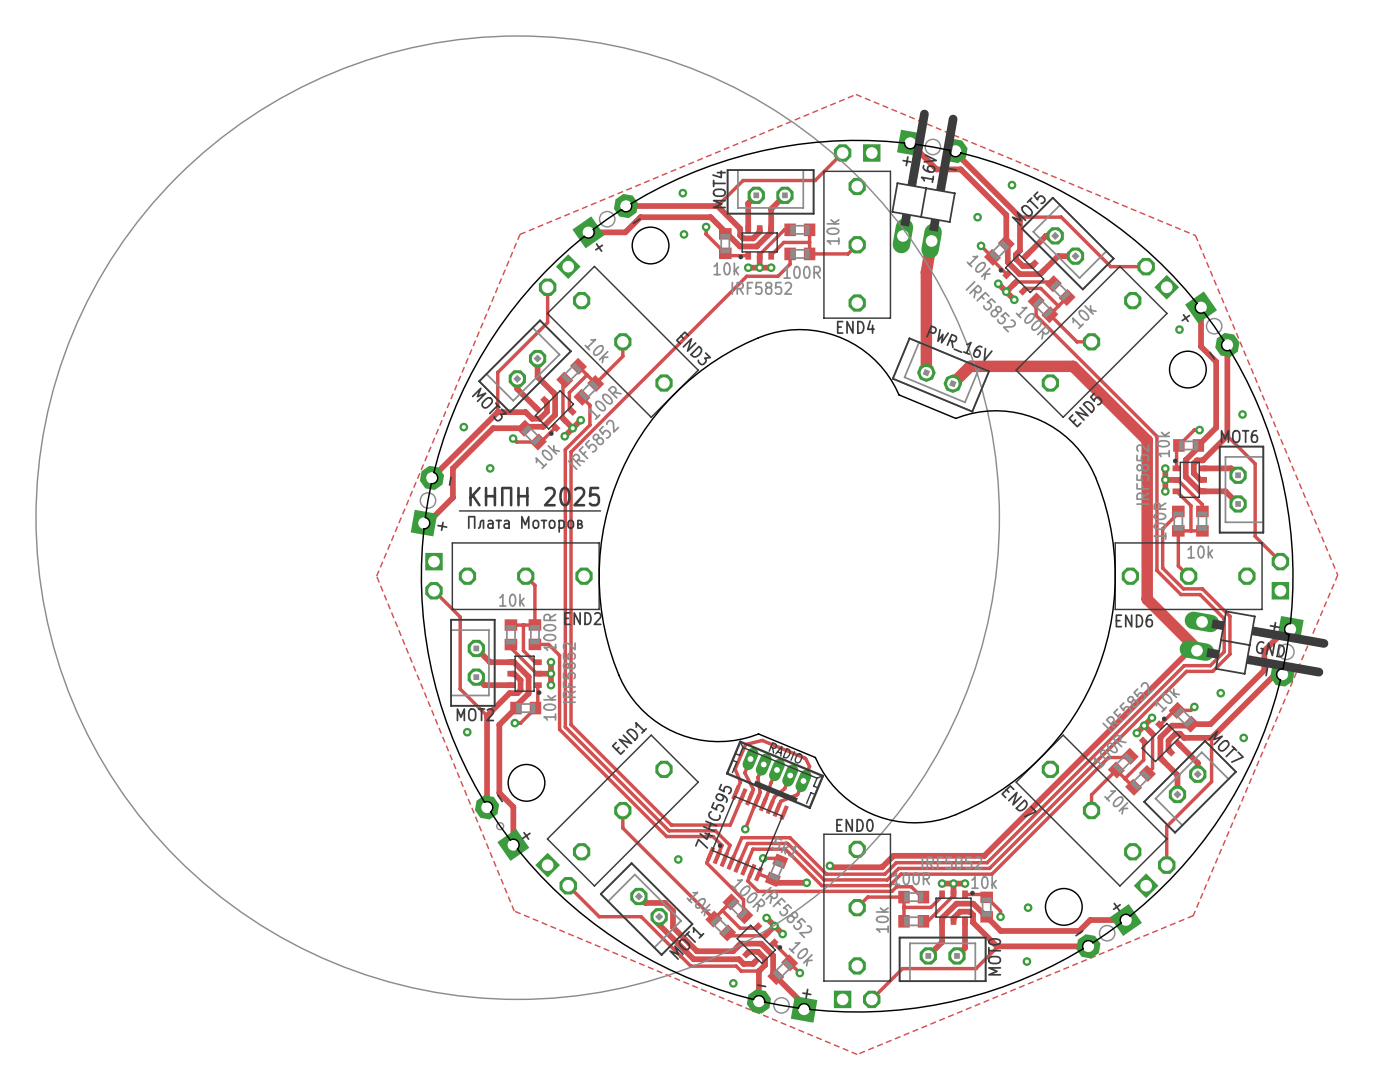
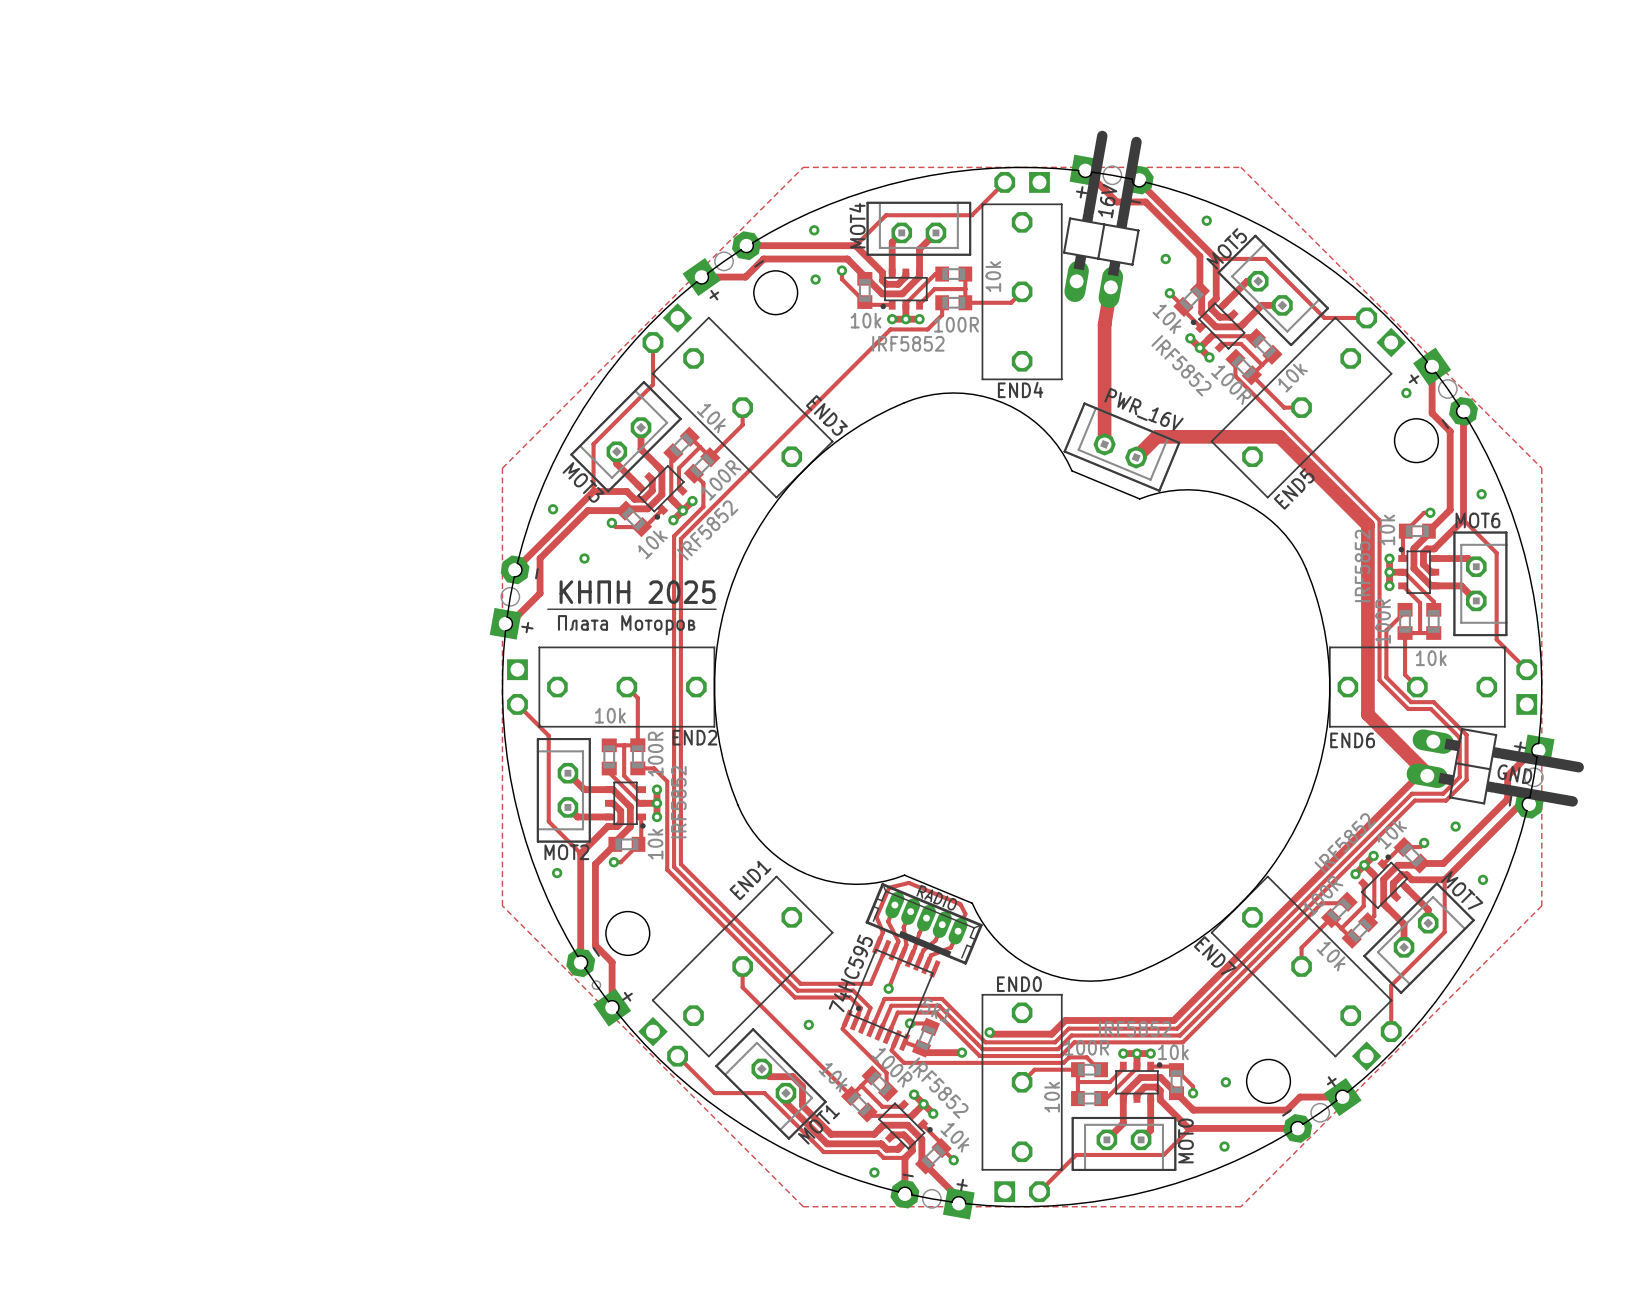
drawing: [35, 35, 1000, 1000] -> none
zone outline: (856, 94) (1195, 235) (1337, 575) (1193, 915) (857, 1054) (514, 911) (376, 576) (520, 234) (856, 94) -> (803, 167) (502, 468) (502, 905) (803, 1206) (1240, 1206) (1541, 905) (1541, 468) (1240, 167) (803, 167)

